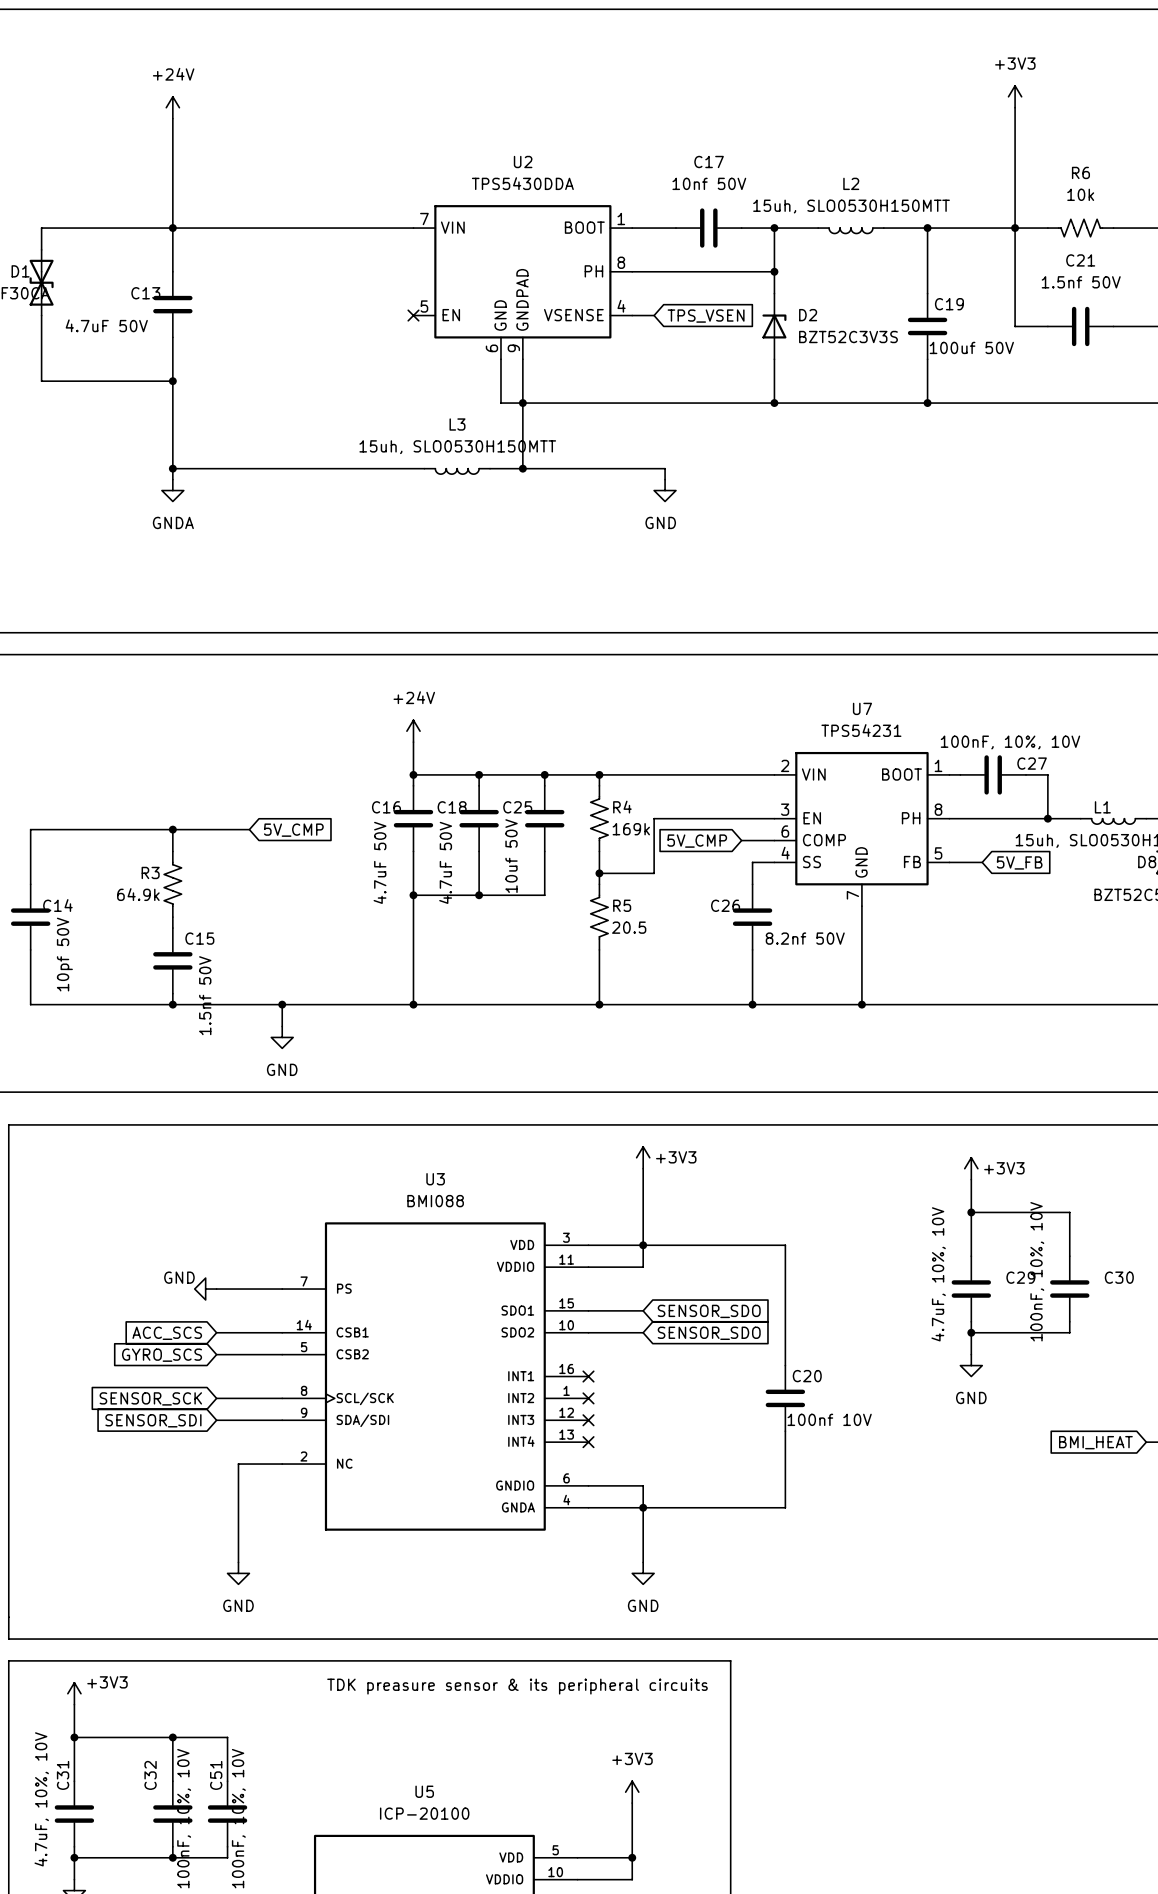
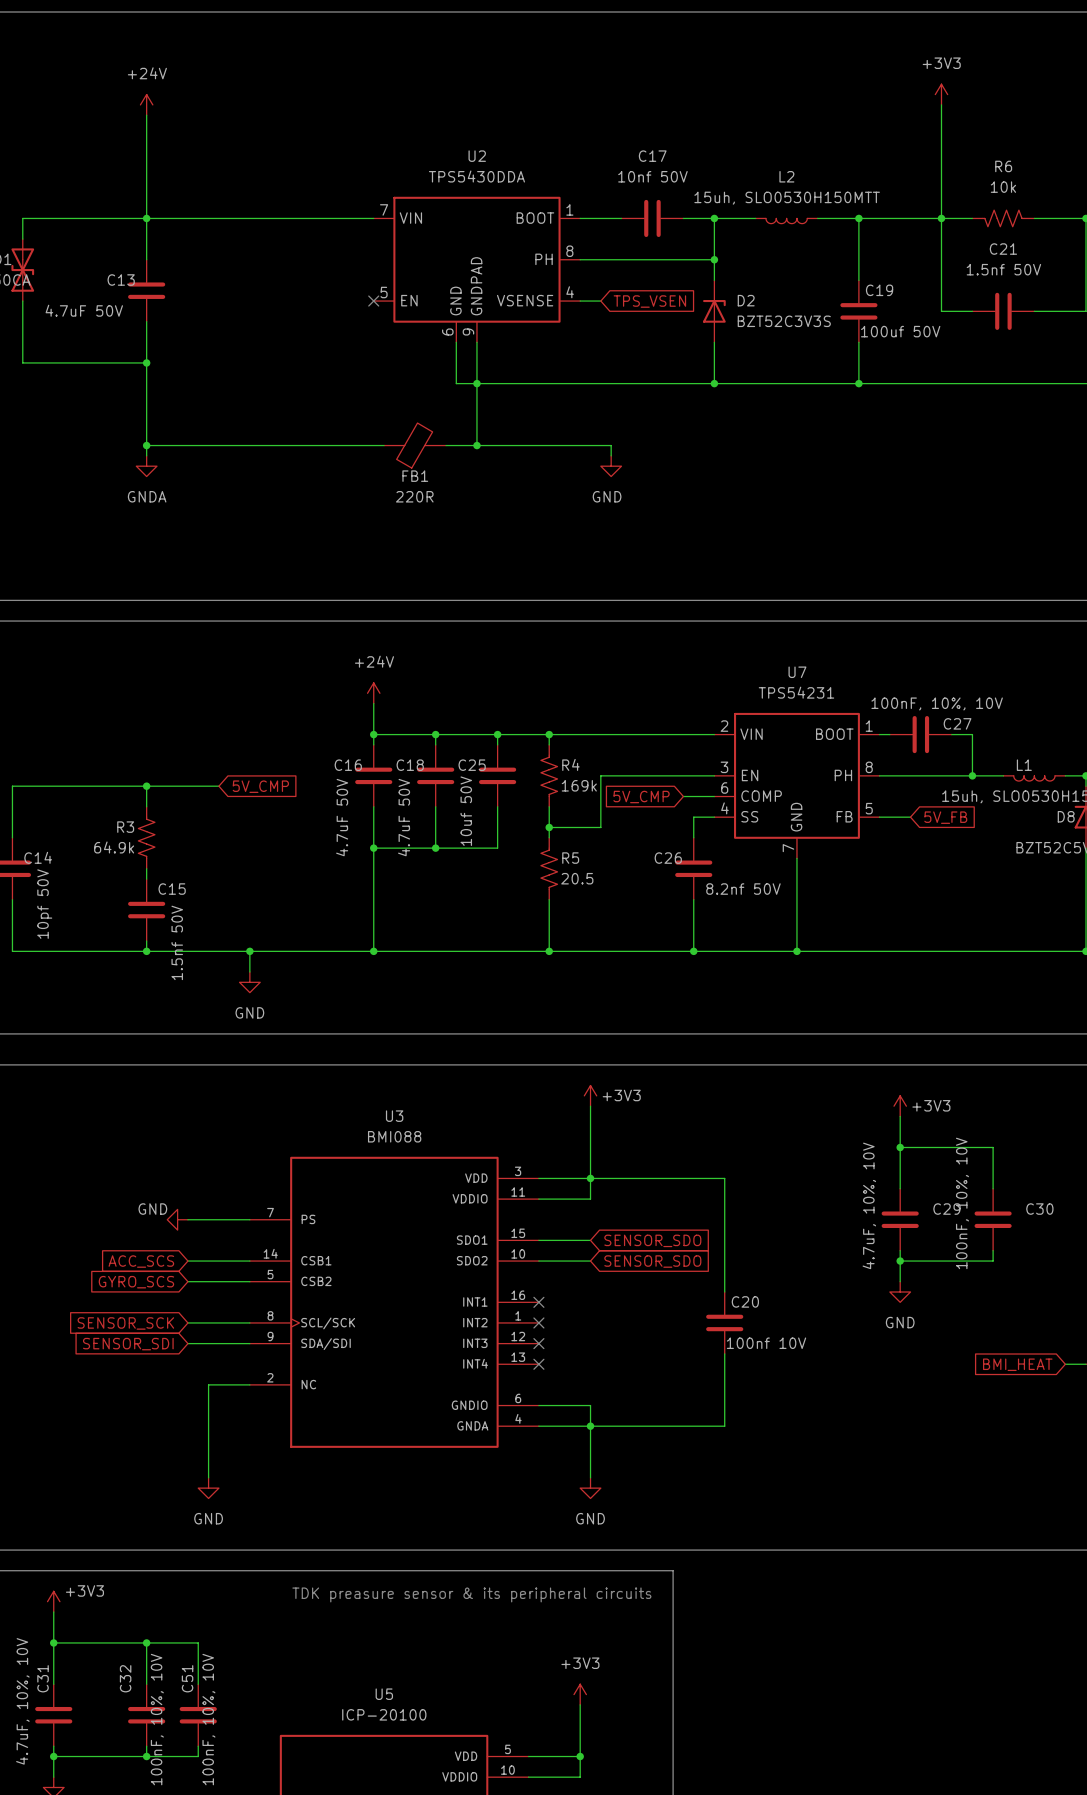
FB1: none -> 220R (415, 445)
L3: 15uh, SLO0530H150MTT (457, 471) -> none

